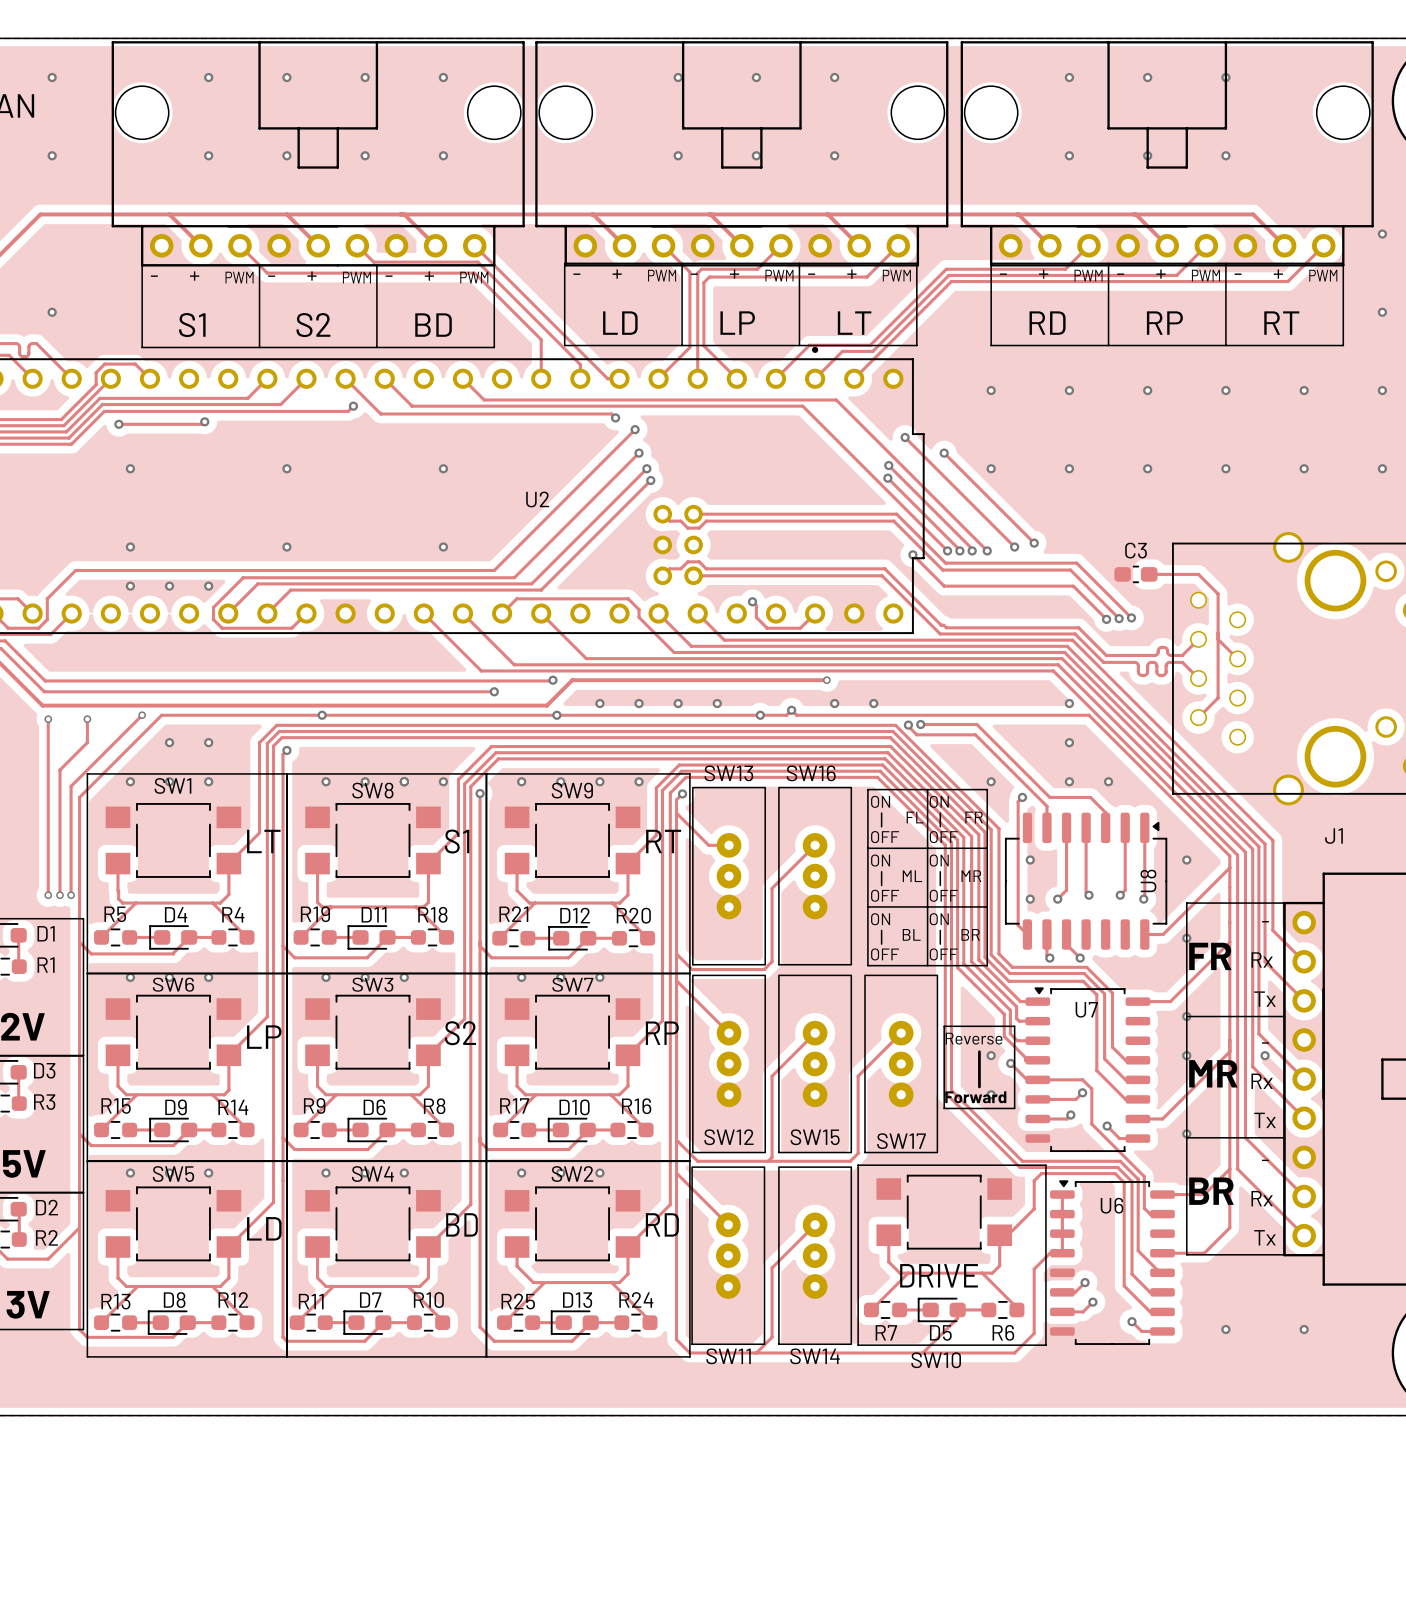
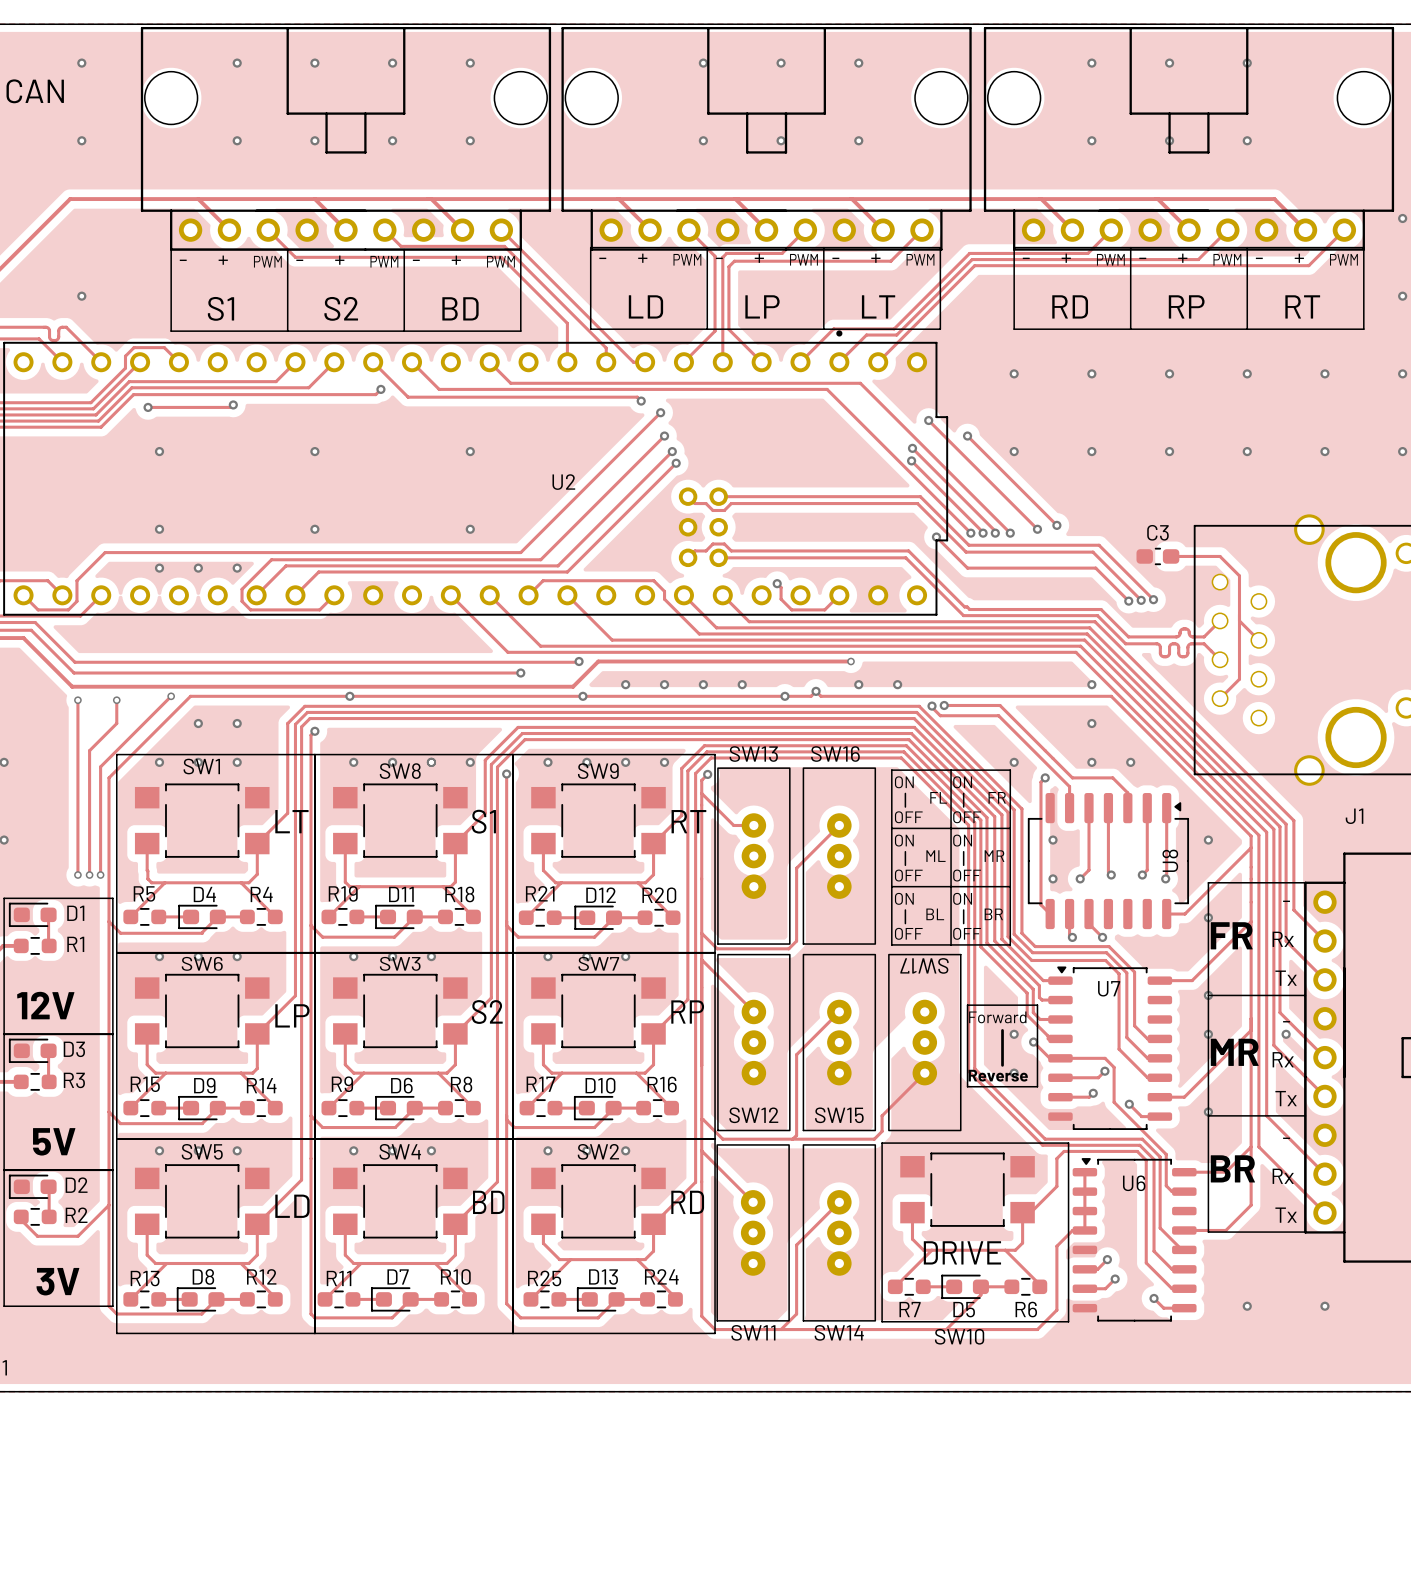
track: (901, 1033) (858, 1076) (858, 1137) -> (924, 1073) (882, 1115)
text: Reverse (974, 1038) -> Forward (997, 1017)
text: Forward (975, 1097) -> Reverse (998, 1075)
SW17 name rotation: 0° (901, 1141) -> 180° (924, 965)
SW17 name position: SW17 (901, 1141) -> SW17 (924, 965)

